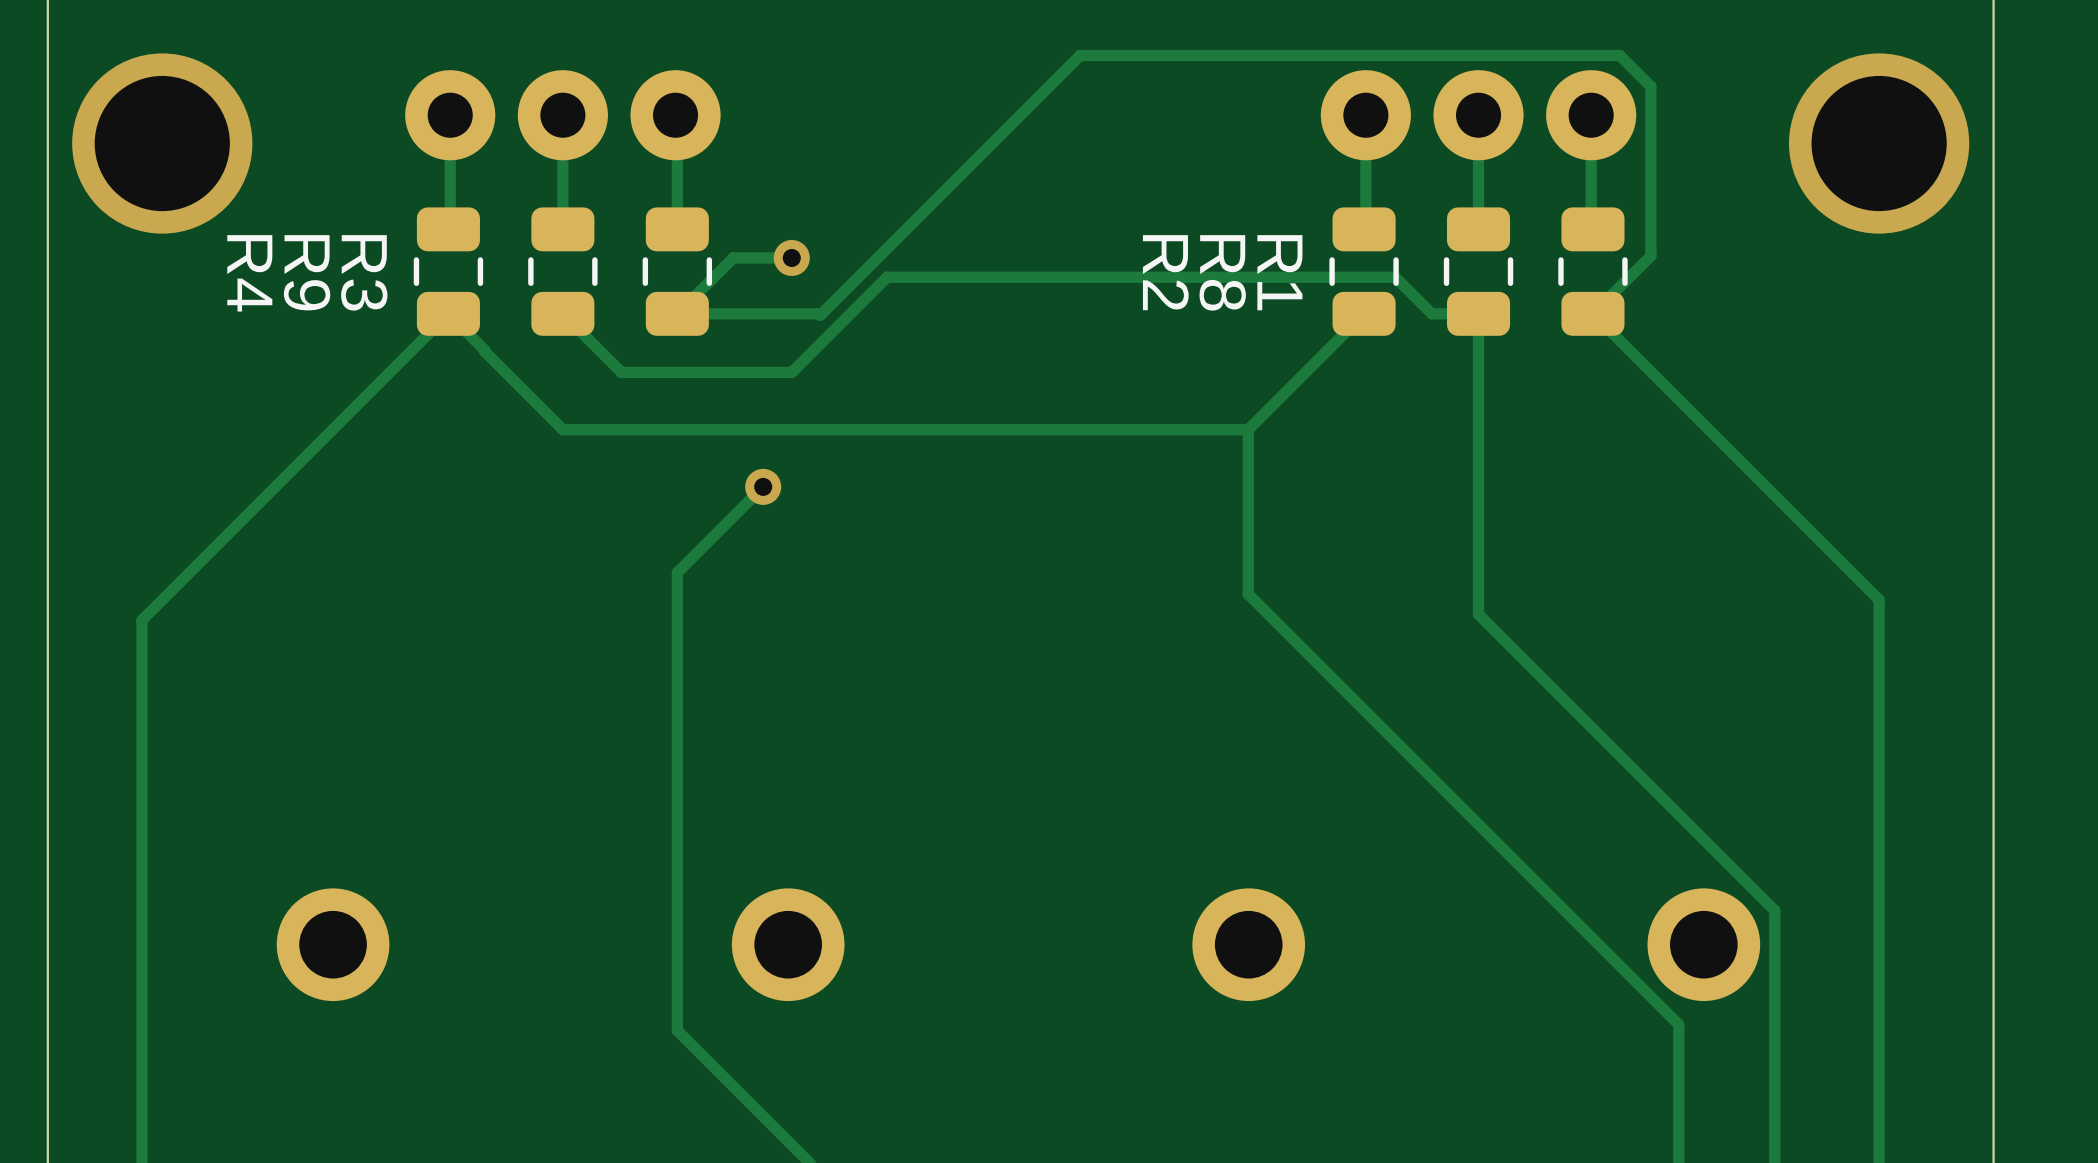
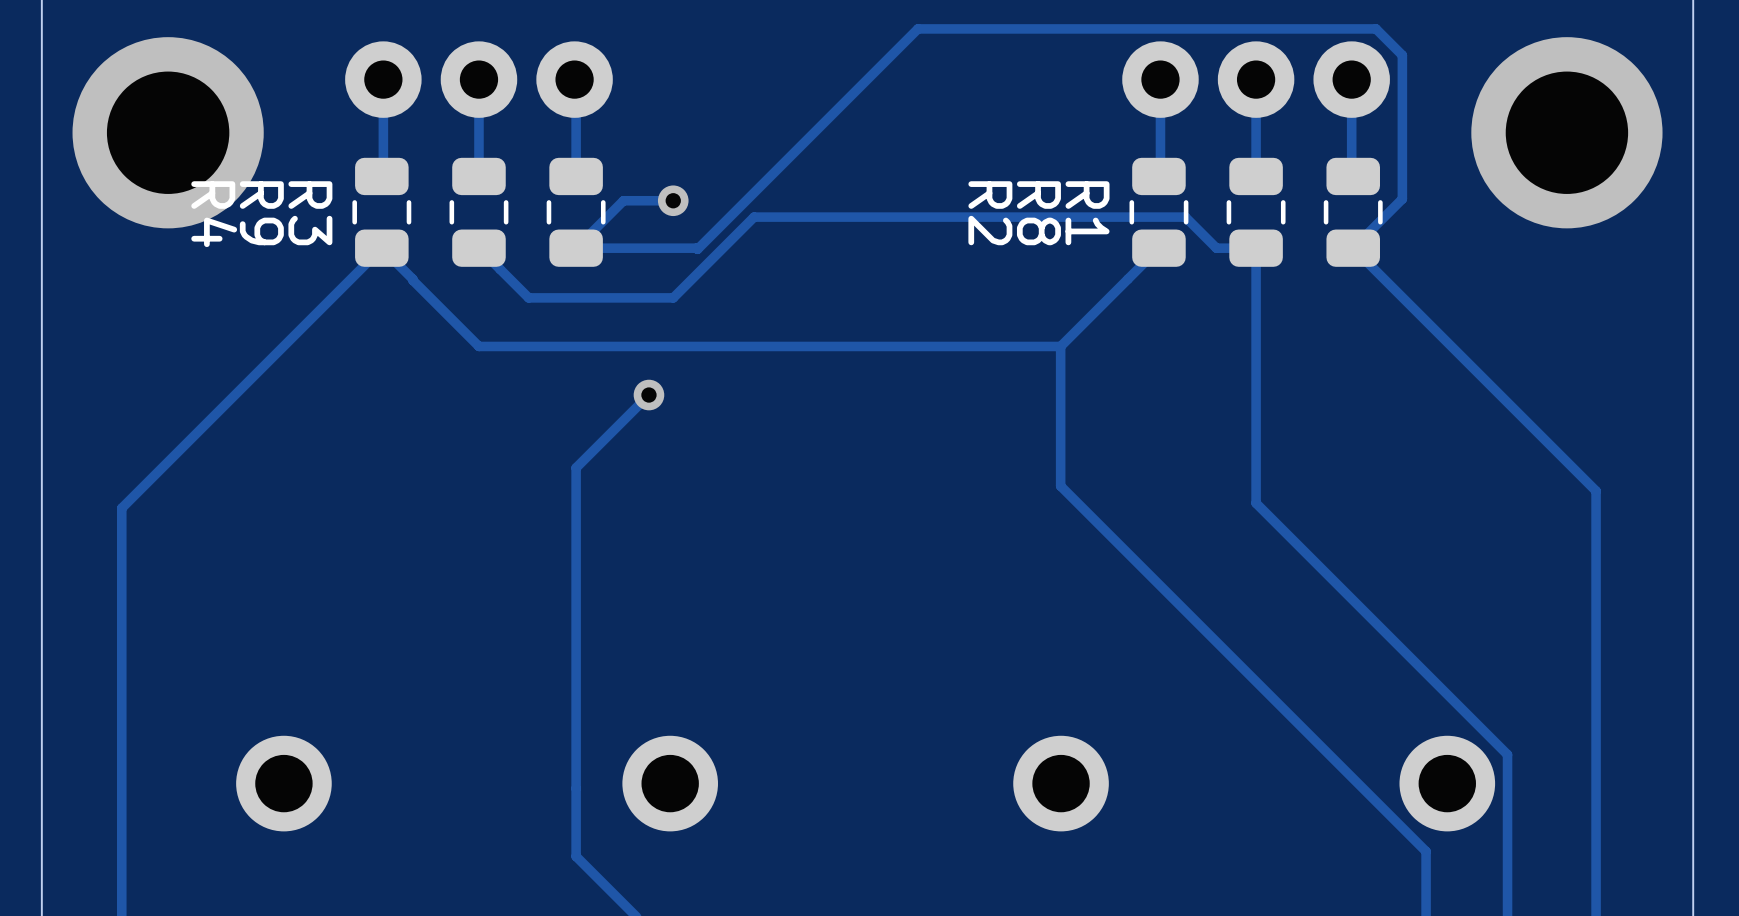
via: (162, 143) -> none
via: (1879, 143) -> none
via: none -> (168, 132)
via: none -> (1566, 132)

